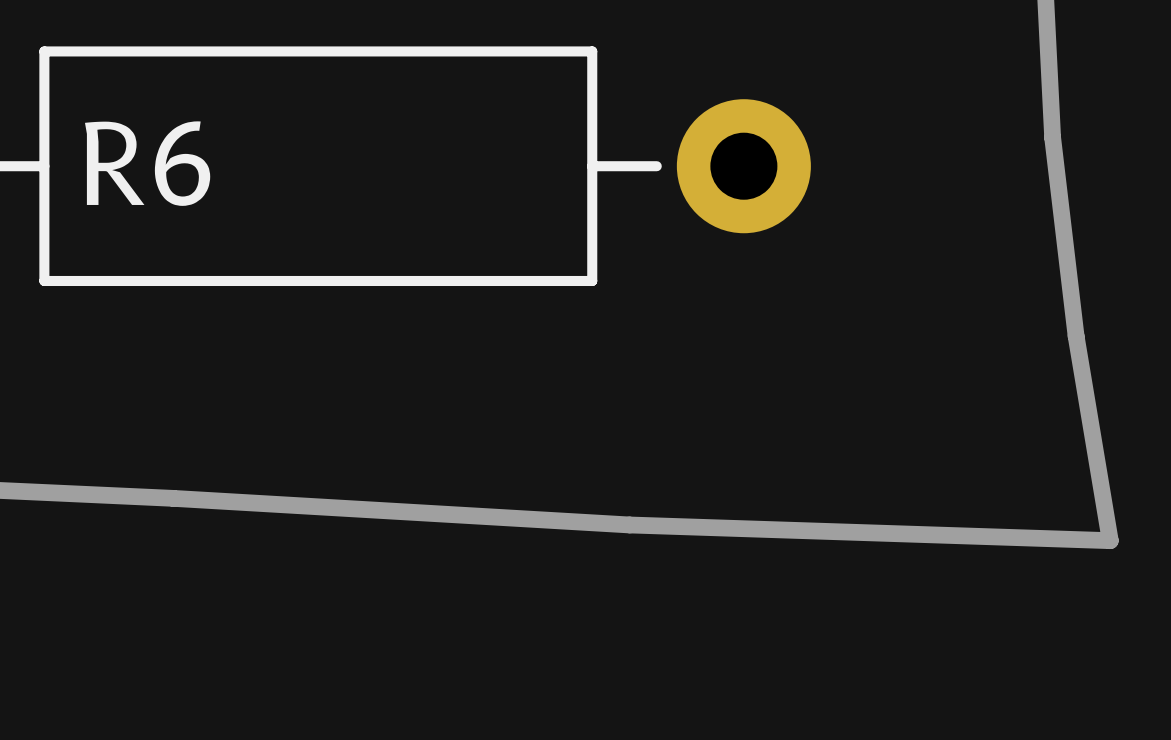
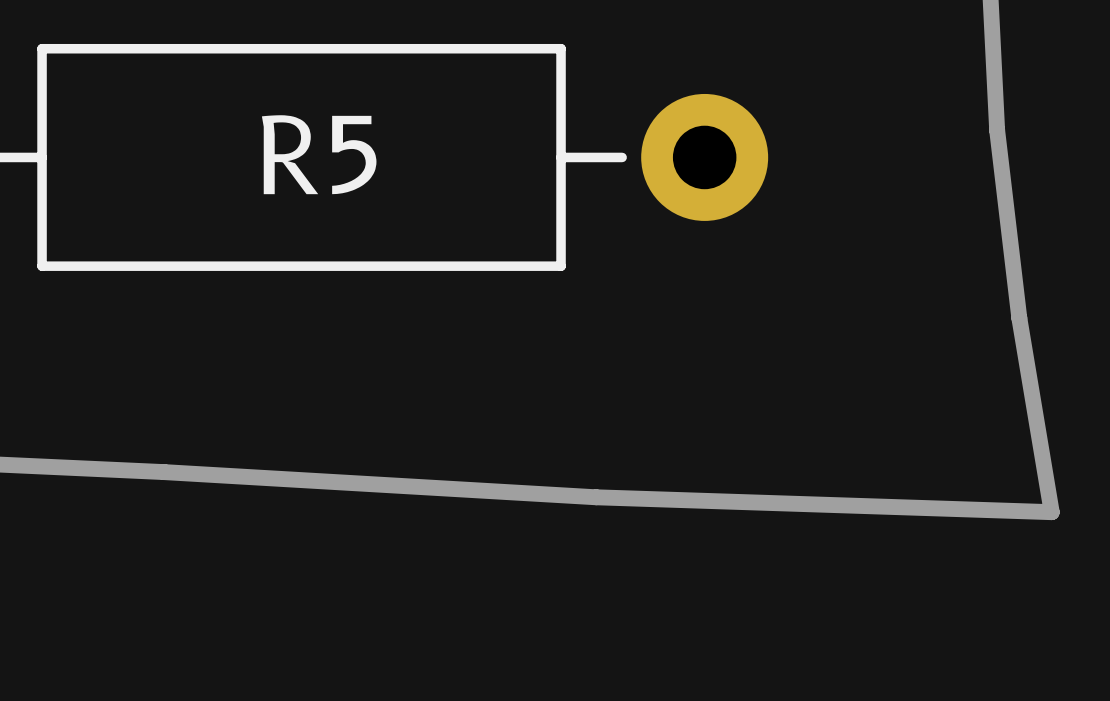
R6 name: R6 (147, 163) -> R5 (319, 154)

